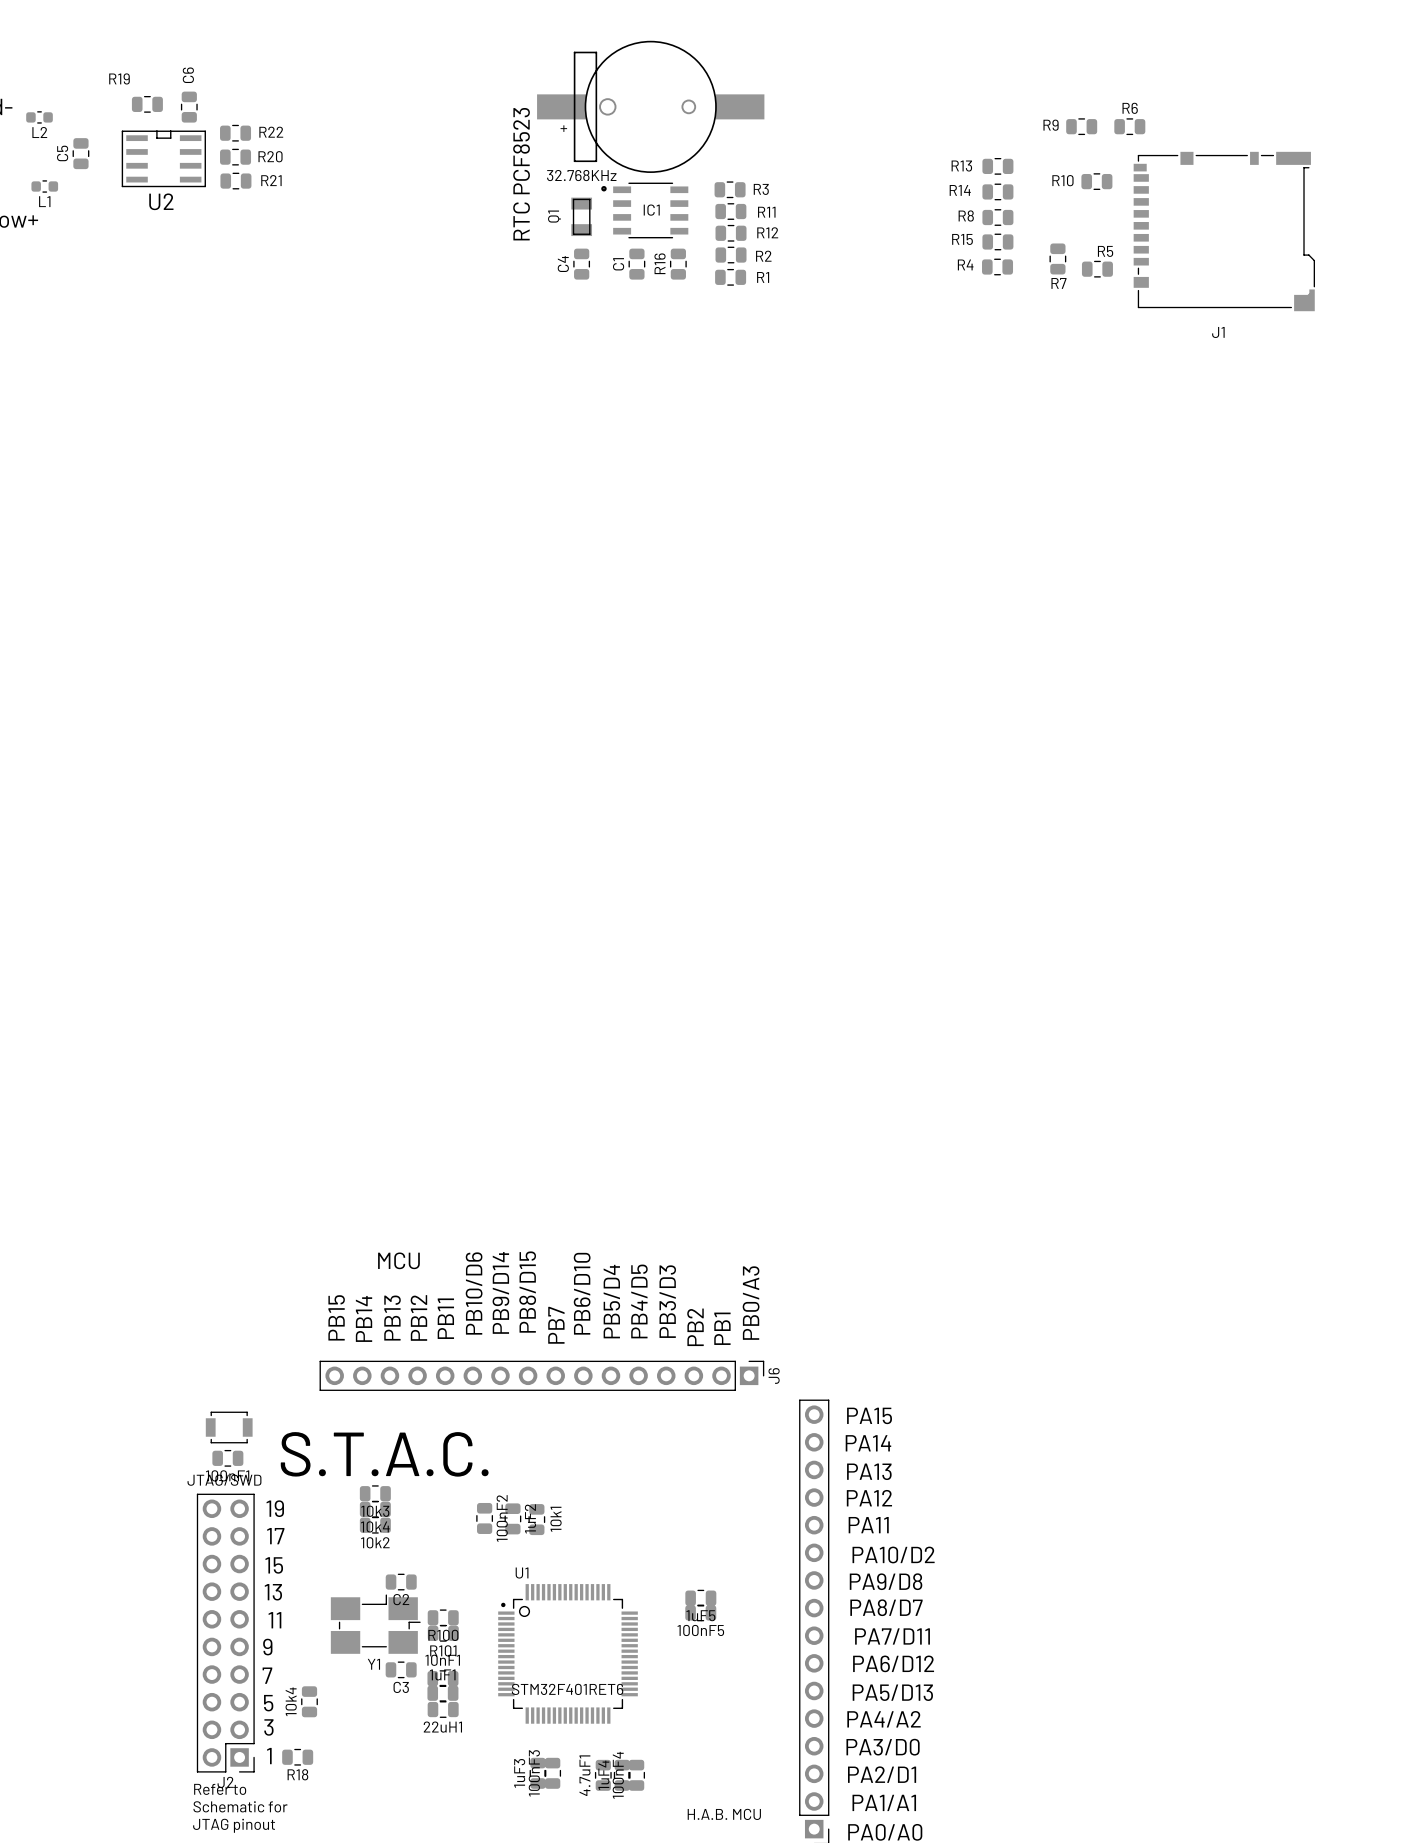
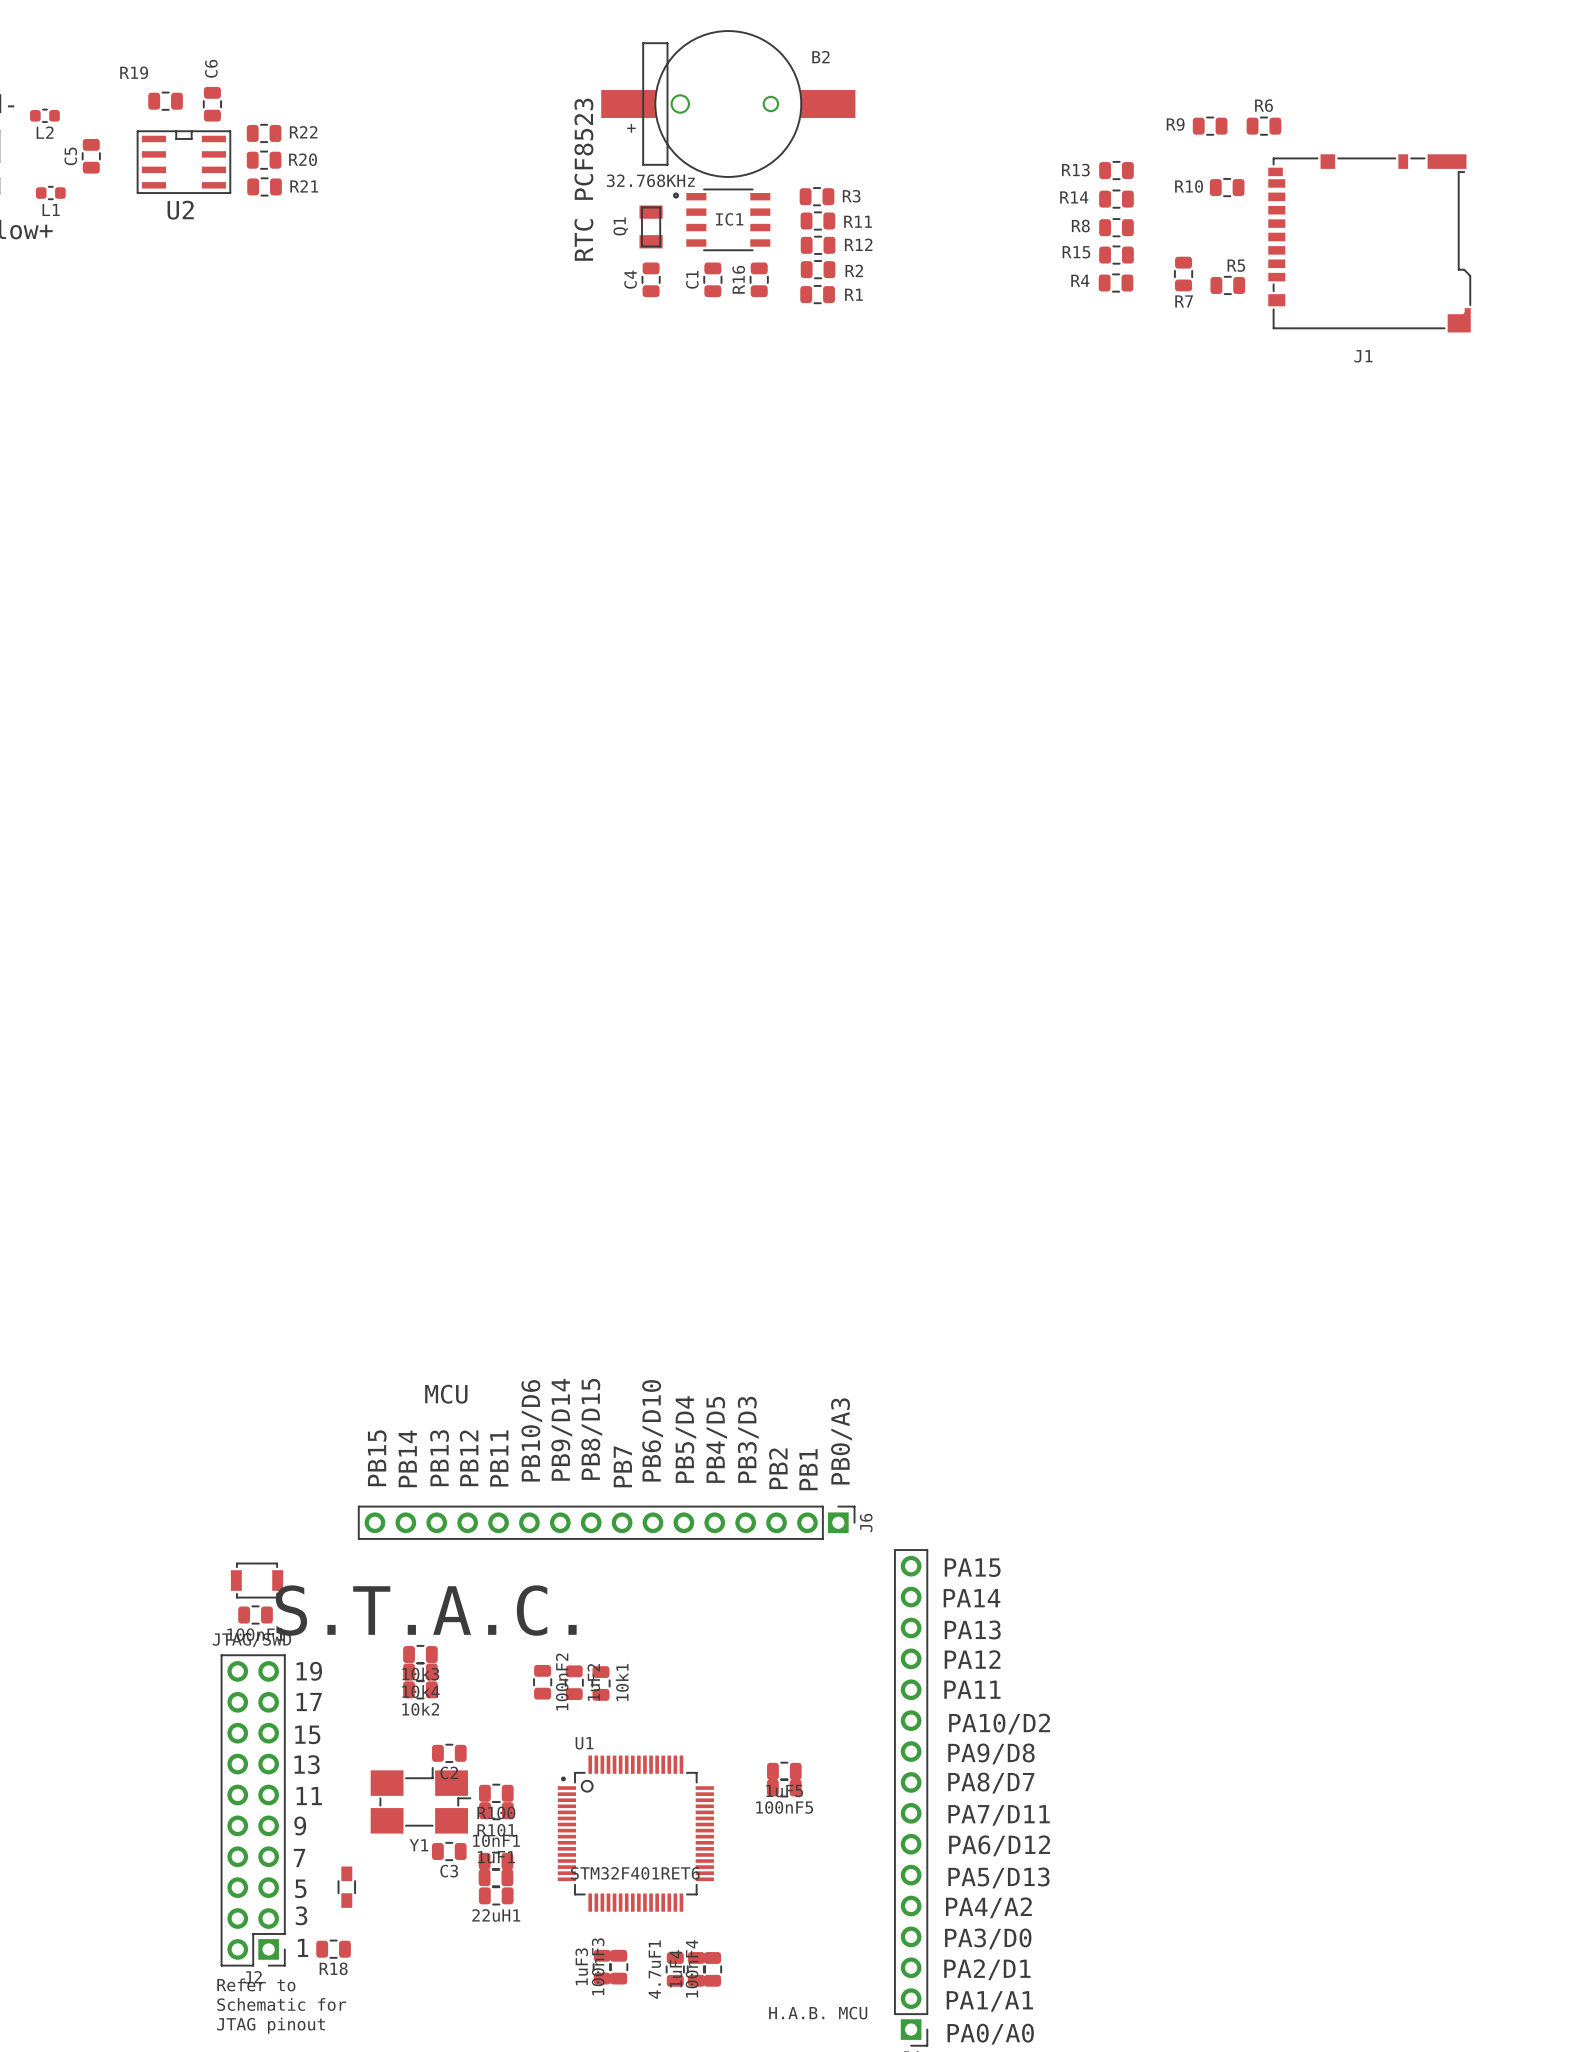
B2 name: none -> B2 (820, 57)
10k4: (309, 1701) -> none
part: none -> (346, 1887)

